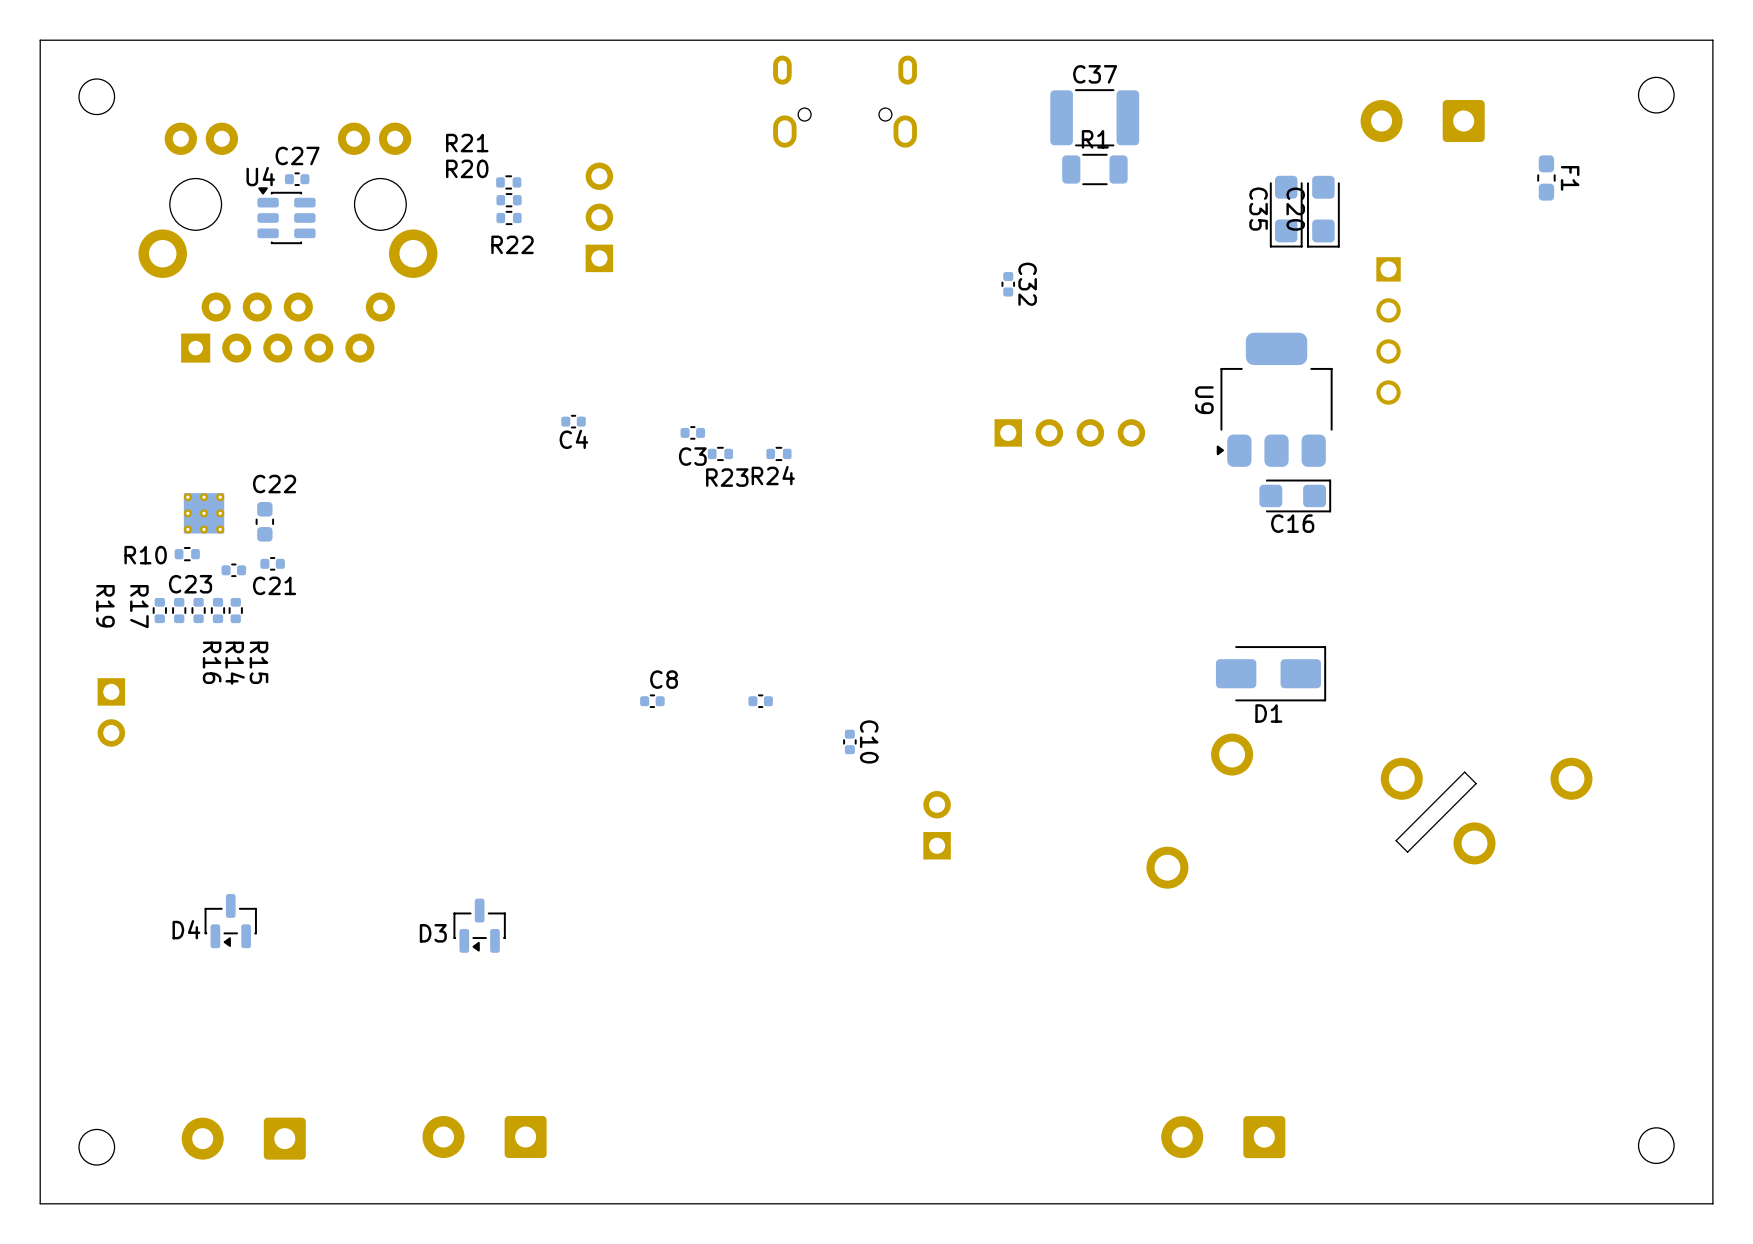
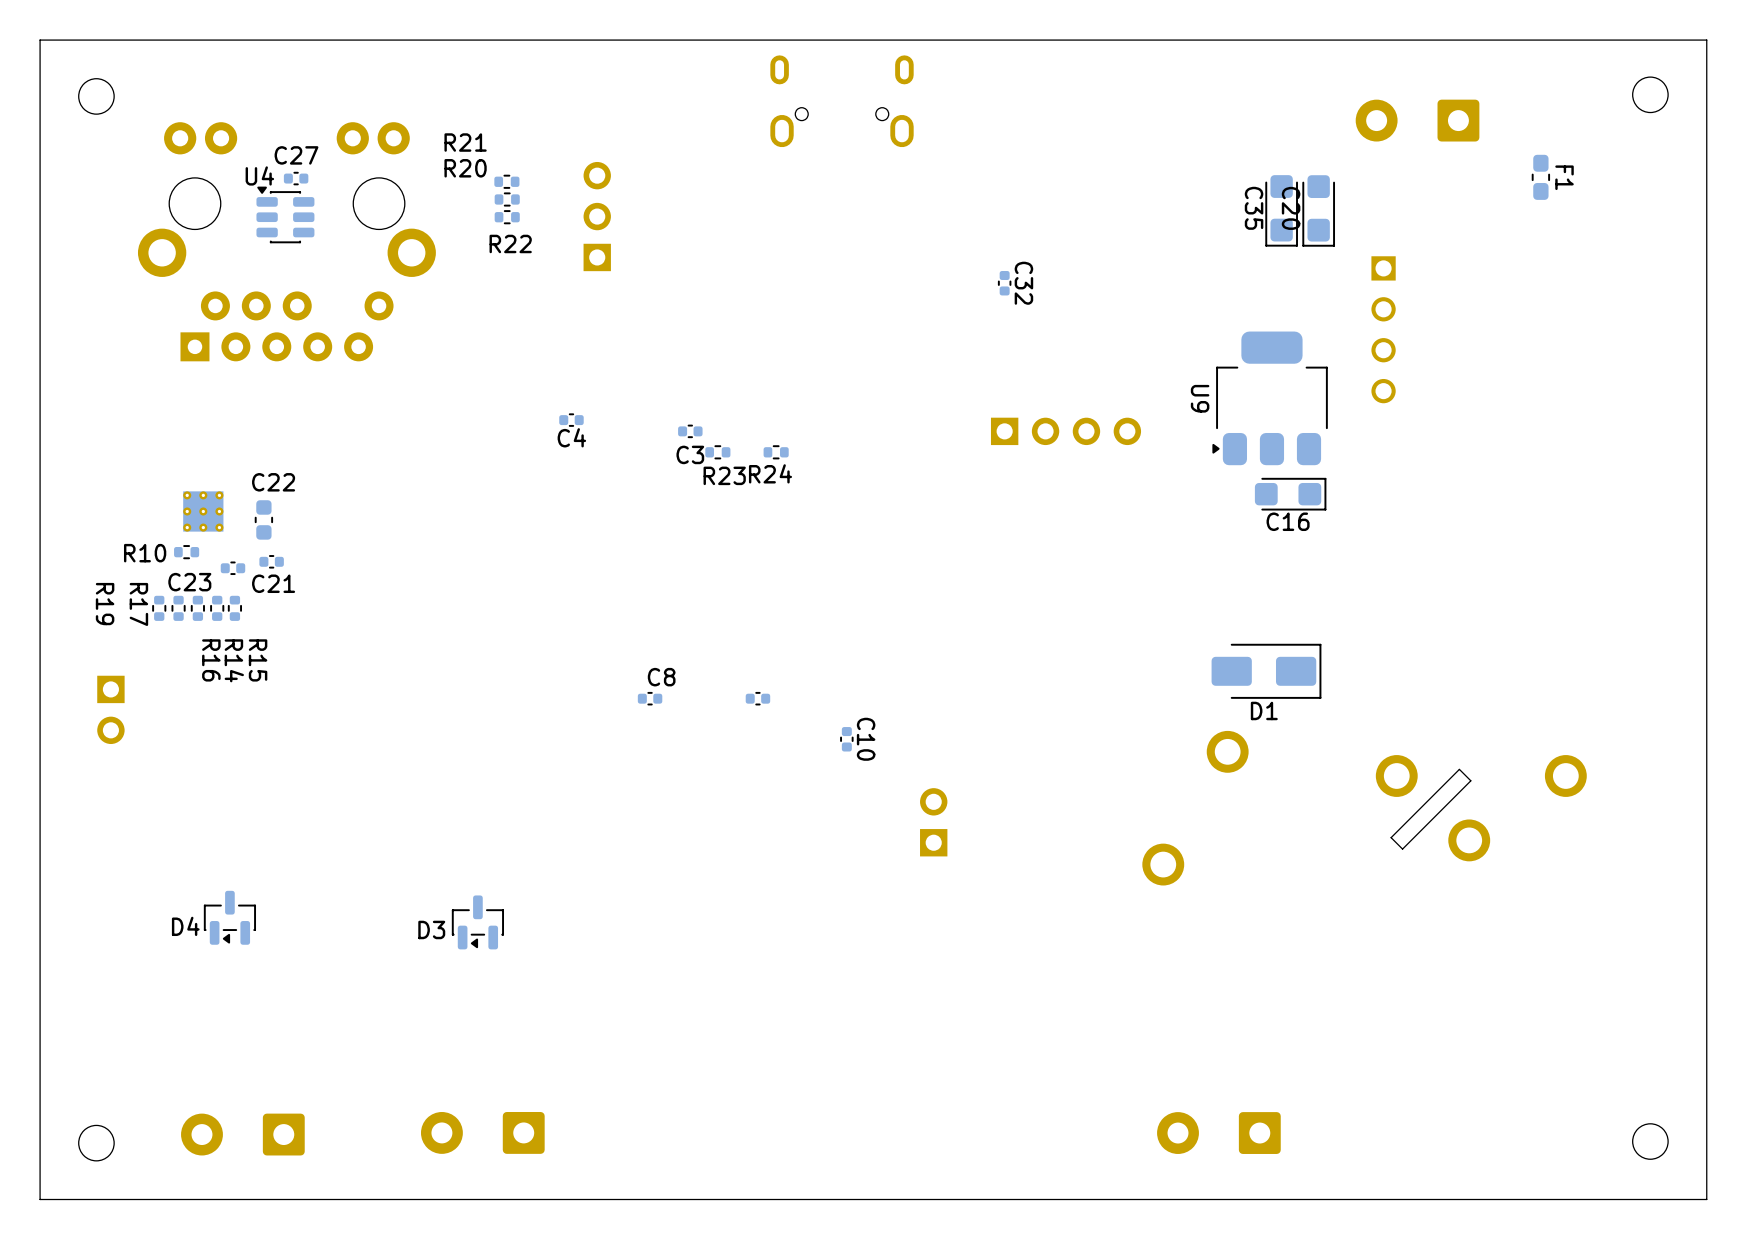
C37: (1094, 117) -> none
R1: (1094, 169) -> none

